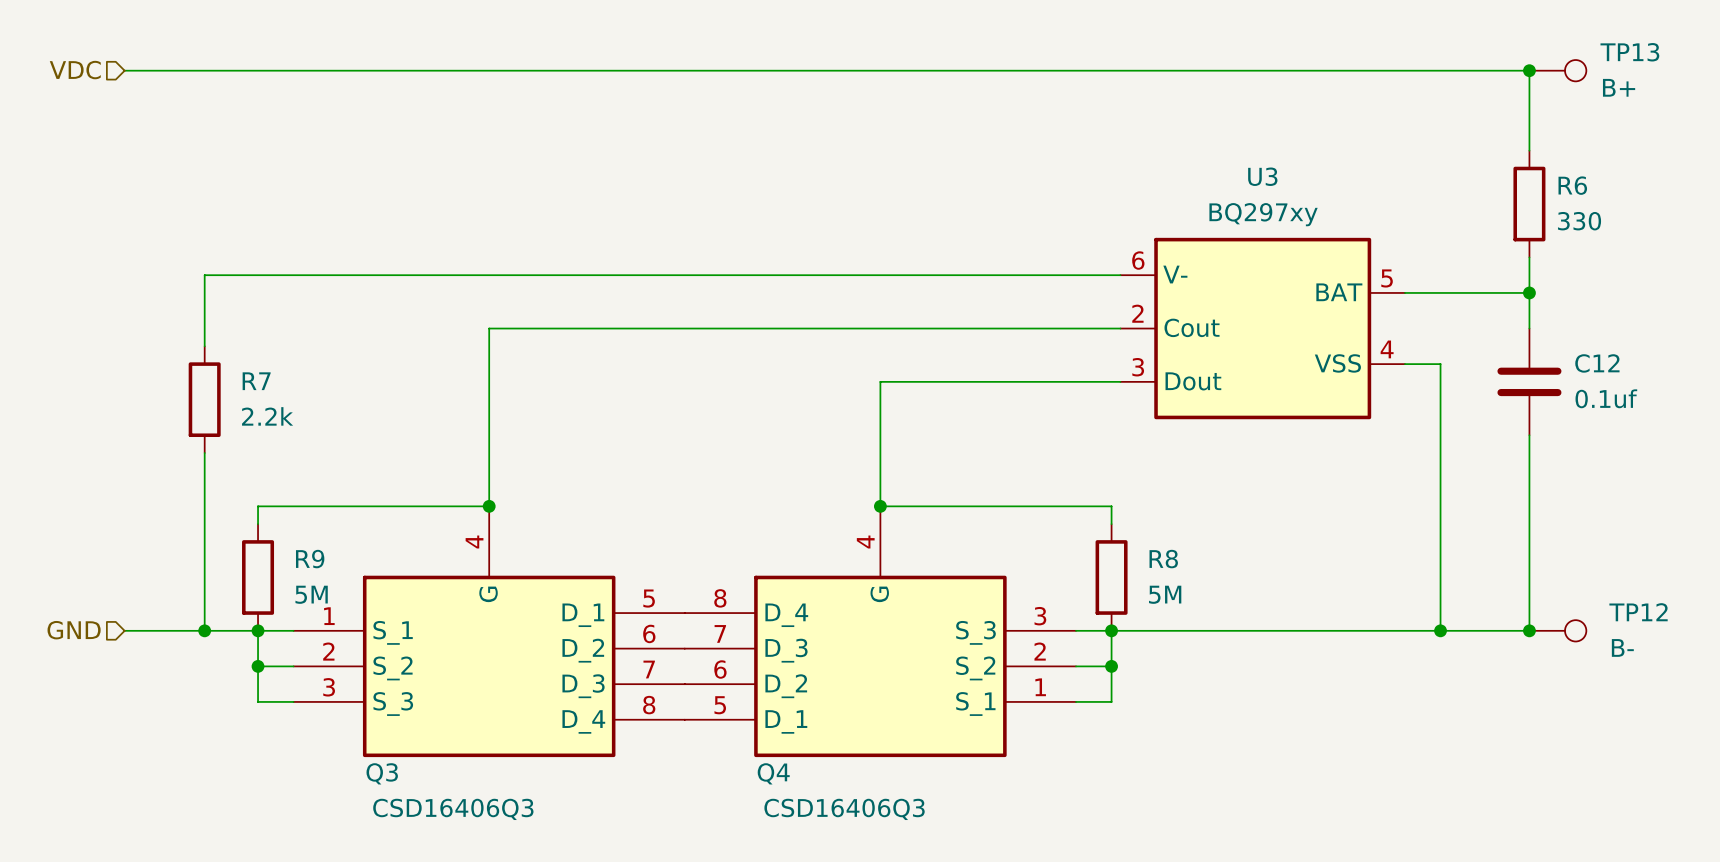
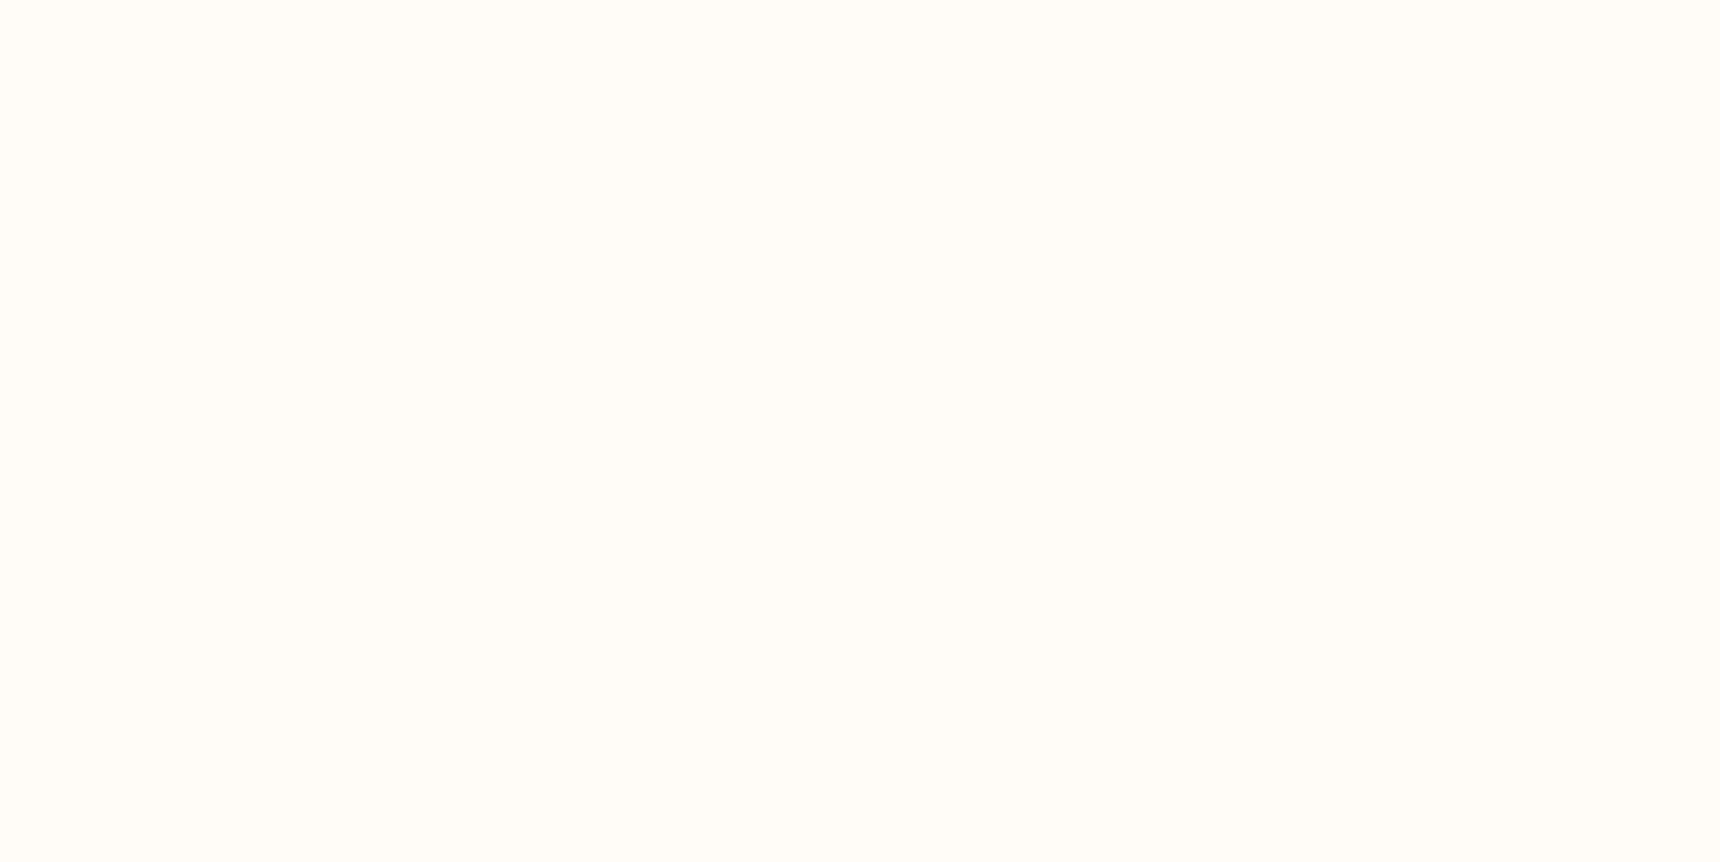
hierarchical label: VDC (75, 70) -> none
wire: (124, 70) (1529, 70) (1529, 150) -> none
junction: (1529, 70) -> none
TP13: B+ (1557, 70) -> none
R6: 330 (1529, 204) -> none
wire: (1529, 257) (1529, 328) -> none
wire: (1120, 275) (204, 275) (204, 346) -> none
wire: (1404, 292) (1529, 292) -> none
junction: (1529, 292) -> none
wire: (1120, 328) (489, 328) (489, 506) (258, 506) (258, 524) -> none
U3: BQ297xy (1262, 328) -> none
wire: (1404, 364) (1440, 364) (1440, 630) -> none
wire: (1120, 381) (880, 381) (880, 506) (1111, 506) (1111, 524) -> none
C12: 0.1uf (1529, 381) -> none
R7: 2.2k (204, 399) -> none
wire: (1529, 435) (1529, 630) (1076, 630) -> none
wire: (204, 453) (204, 630) -> none
junction: (489, 506) -> none
junction: (880, 506) -> none
R9: 5M (258, 577) -> none
R8: 5M (1111, 577) -> none
hierarchical label: GND (74, 630) -> none
wire: (124, 630) (293, 630) -> none
junction: (204, 630) -> none
wire: (258, 630) (258, 701) (293, 701) -> none
junction: (258, 630) -> none
wire: (1111, 630) (1111, 701) (1076, 701) -> none
junction: (1111, 630) -> none
junction: (1440, 630) -> none
junction: (1529, 630) -> none
TP12: B- (1557, 630) -> none
Q3: CSD16406Q3 (489, 631) -> none
Q4: CSD16406Q3 (880, 631) -> none
wire: (258, 666) (293, 666) -> none
junction: (258, 666) -> none
wire: (1076, 666) (1111, 666) -> none
junction: (1111, 666) -> none

